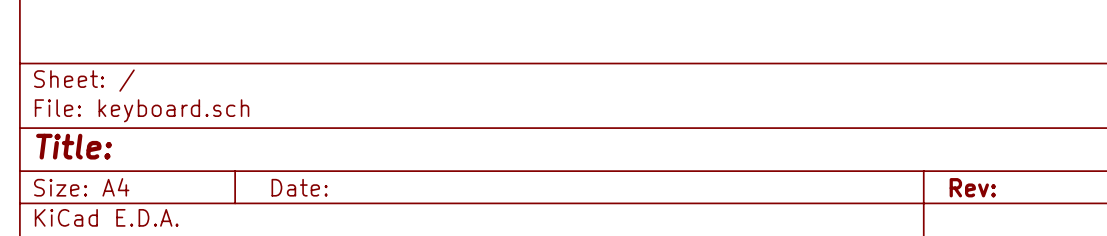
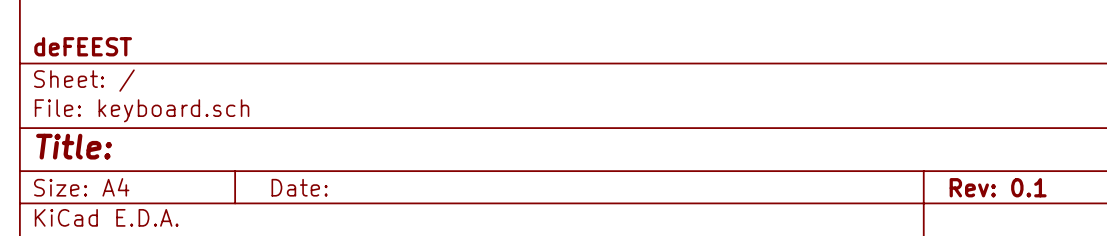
title block: none -> deFEEST (83, 46)
title block: Rev: (972, 187) -> Rev: 0.1 (998, 187)

